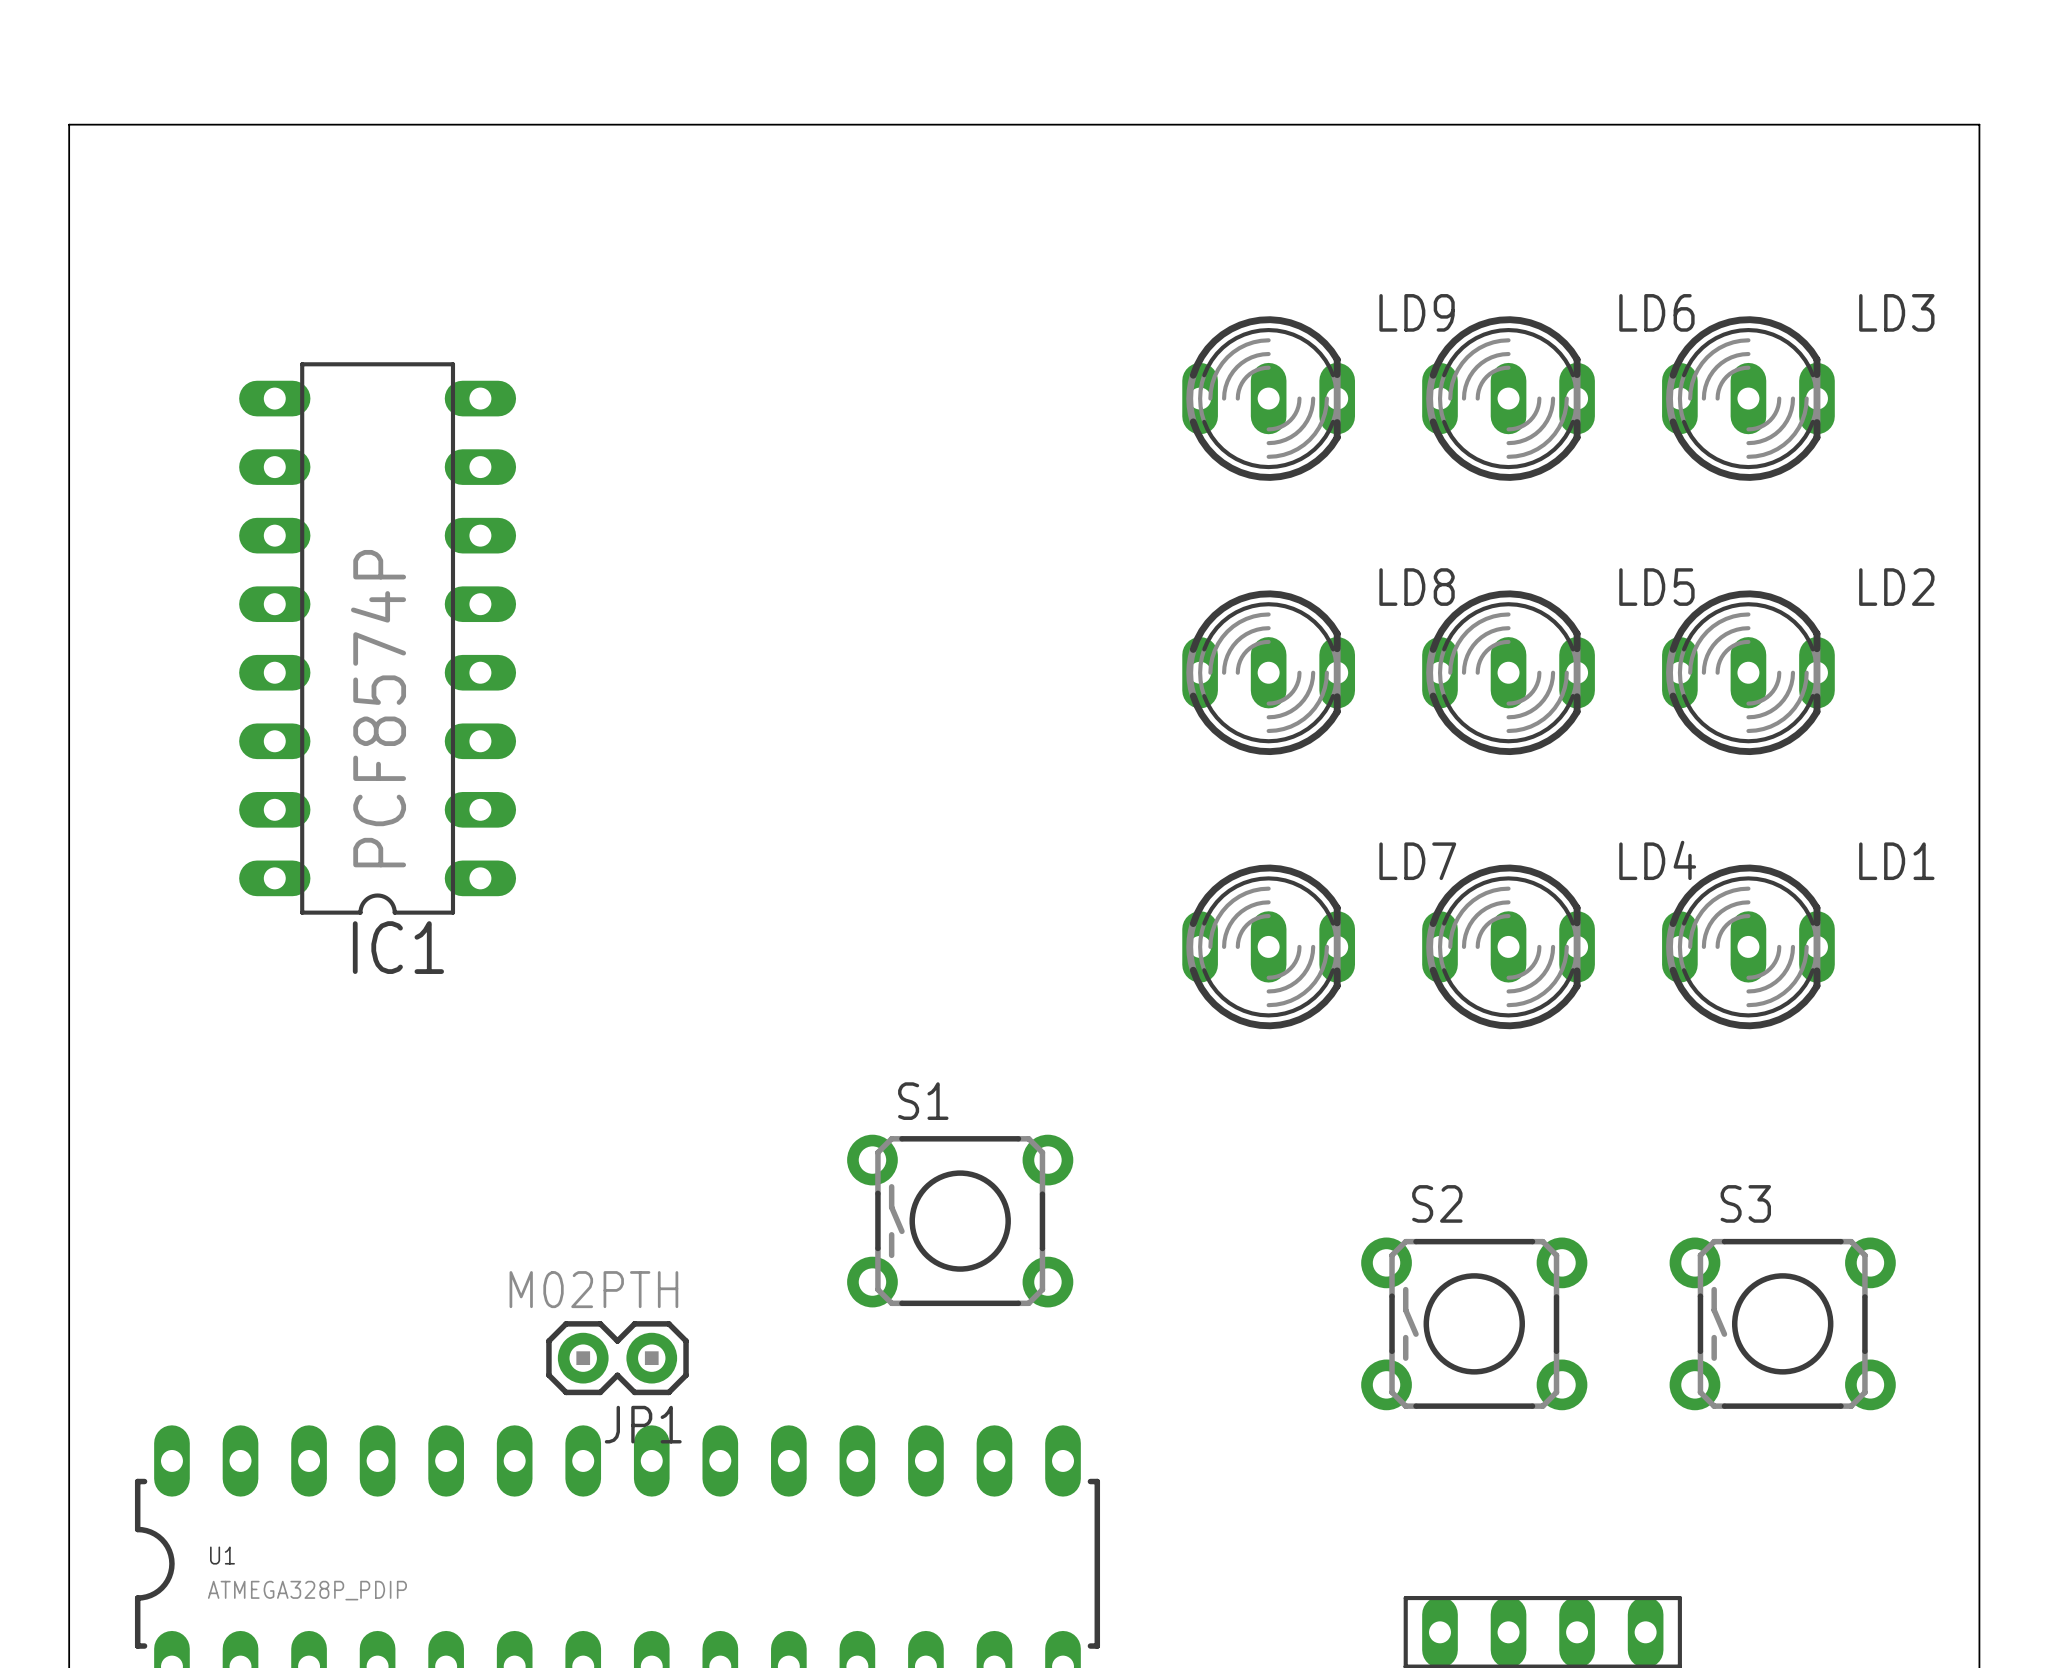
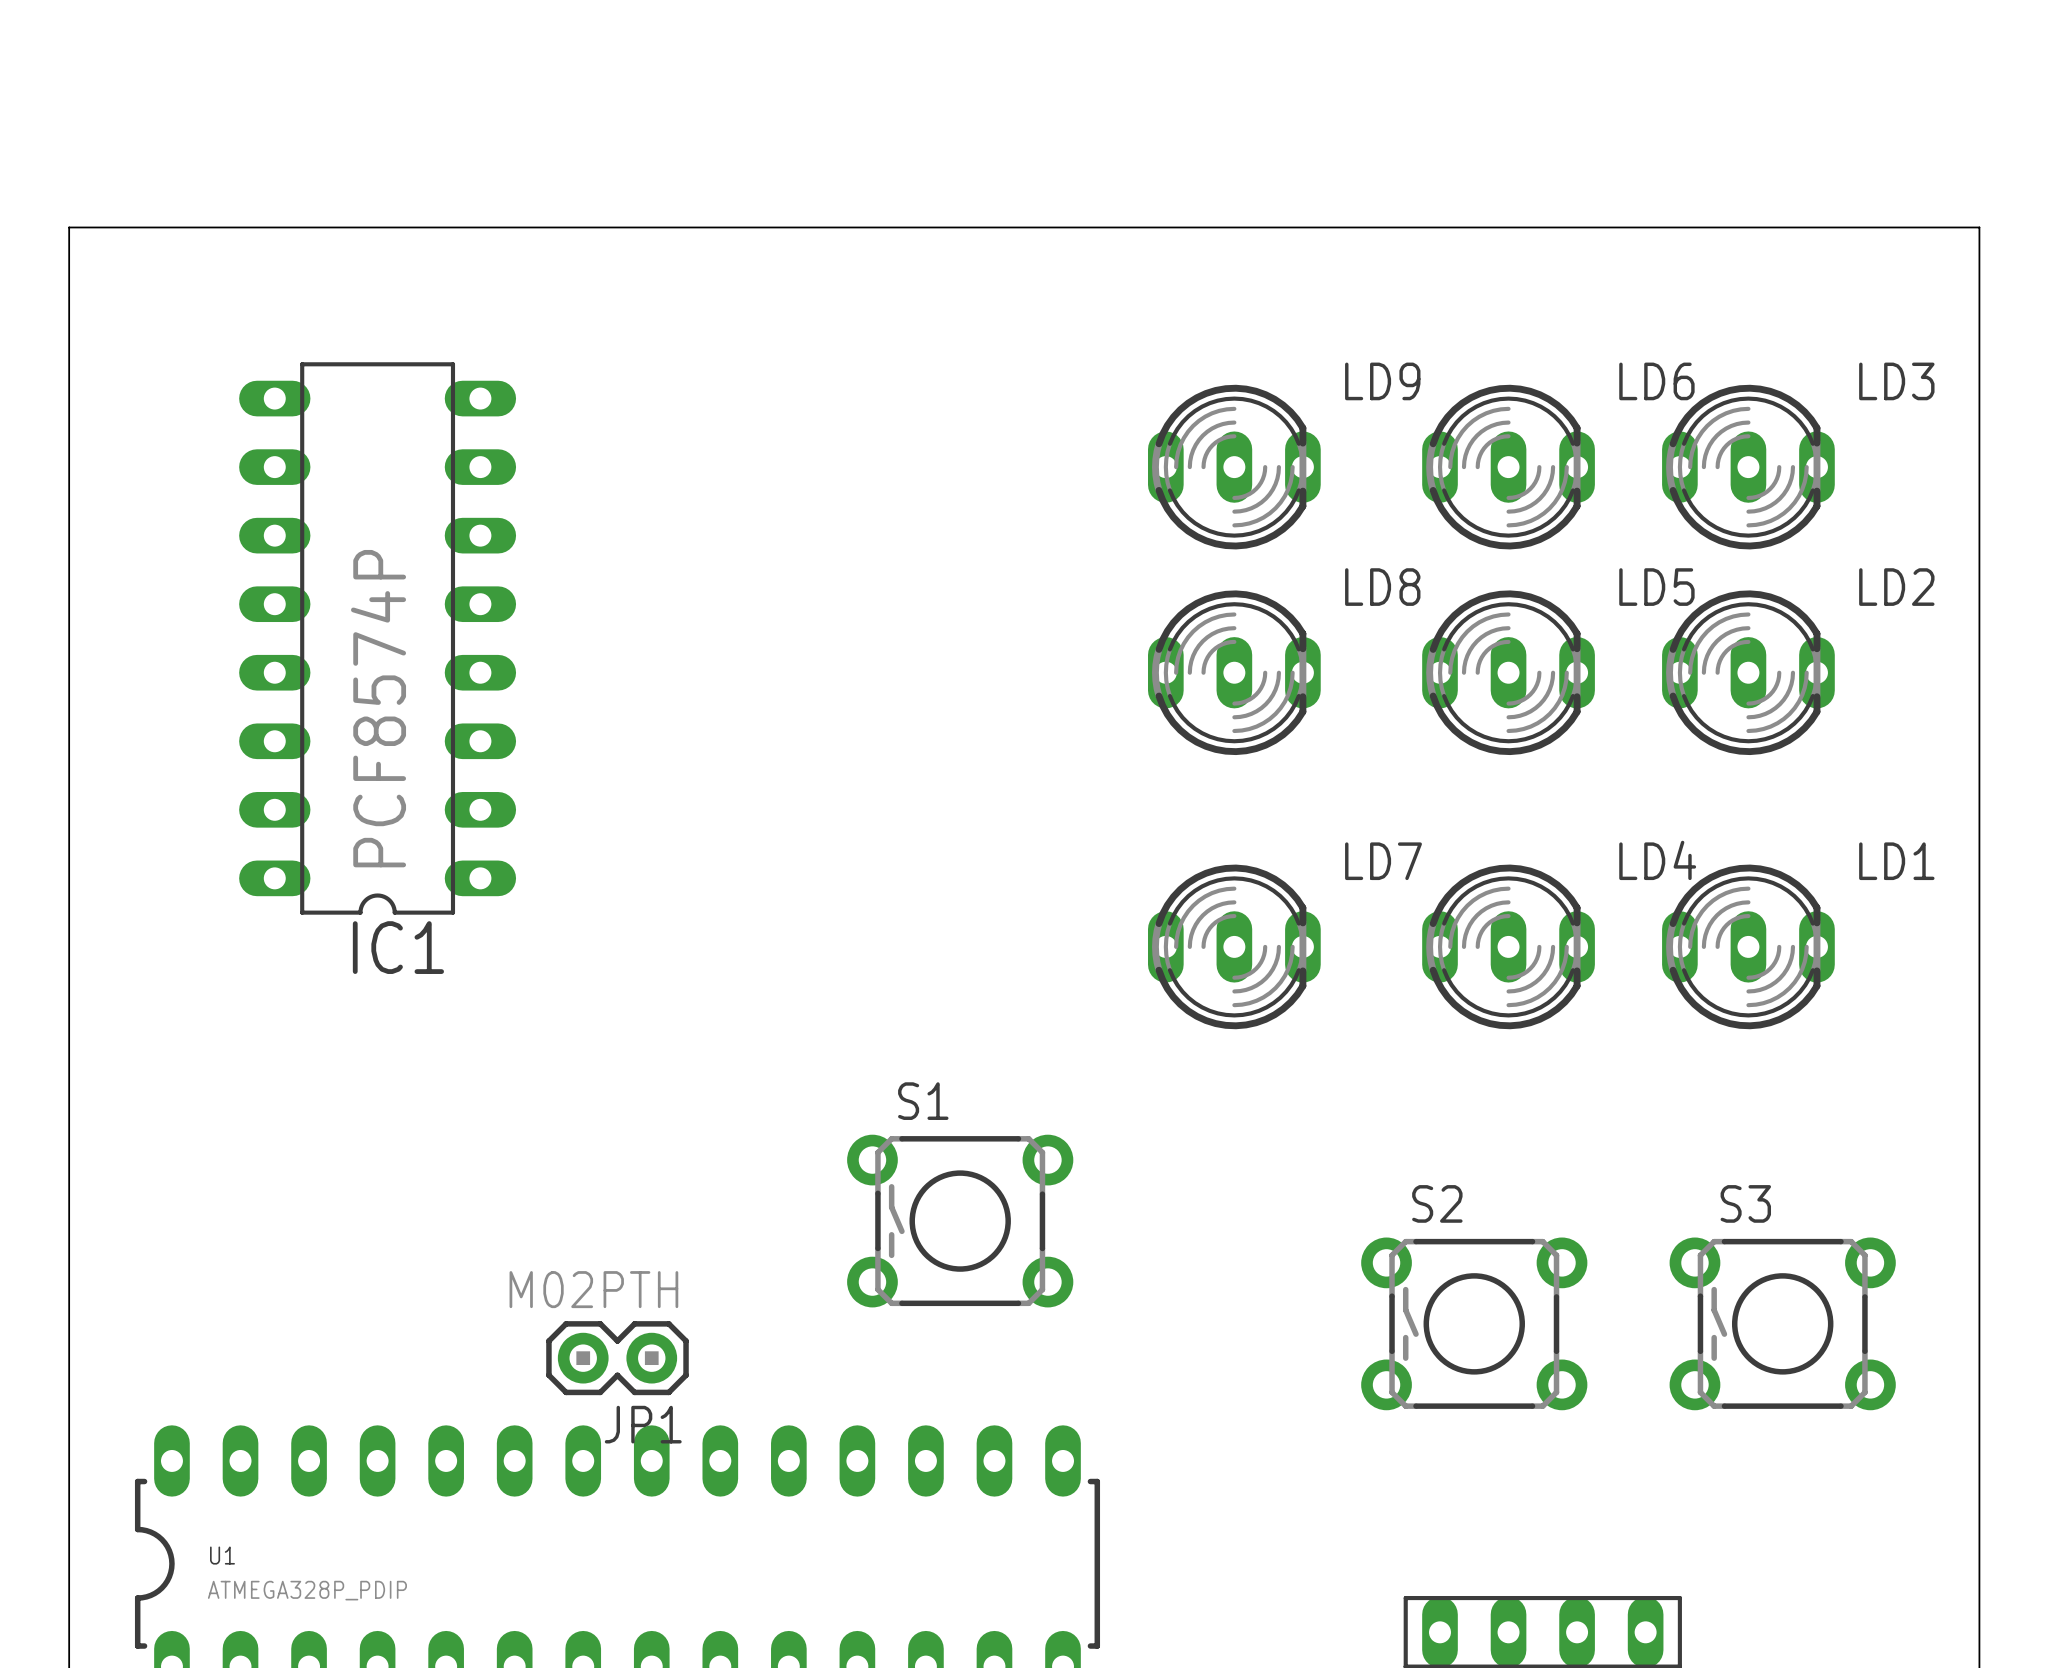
board edge: (69, 227) (69, 124) (1979, 124) (1979, 227) -> (69, 227) (1979, 227)
LD9 position: (1268, 398) -> (1234, 467)
LD6 position: (1508, 398) -> (1508, 467)
LD3 position: (1748, 398) -> (1748, 467)
LD8 position: (1268, 672) -> (1234, 672)
LD7 position: (1268, 946) -> (1234, 946)

